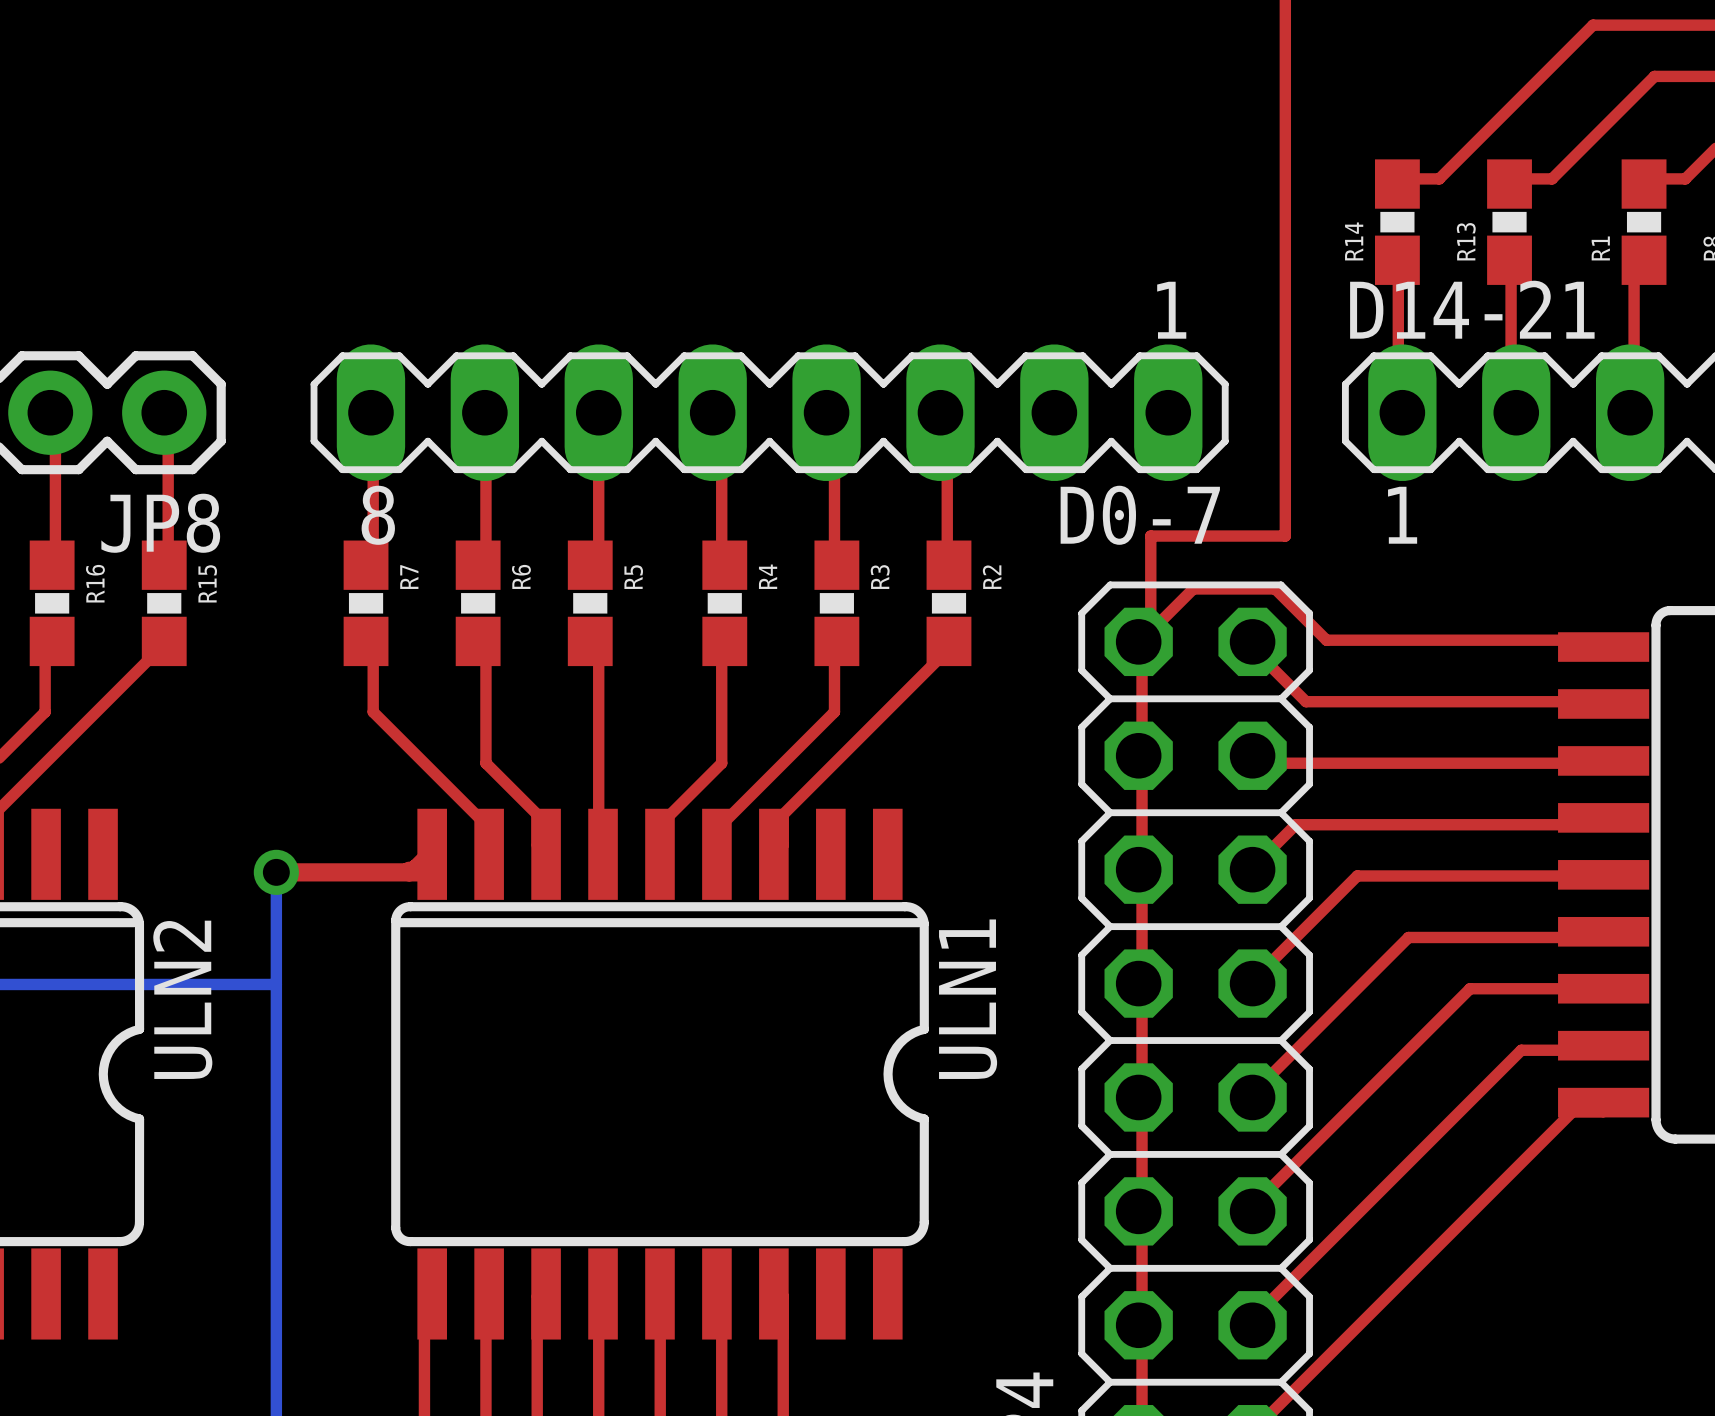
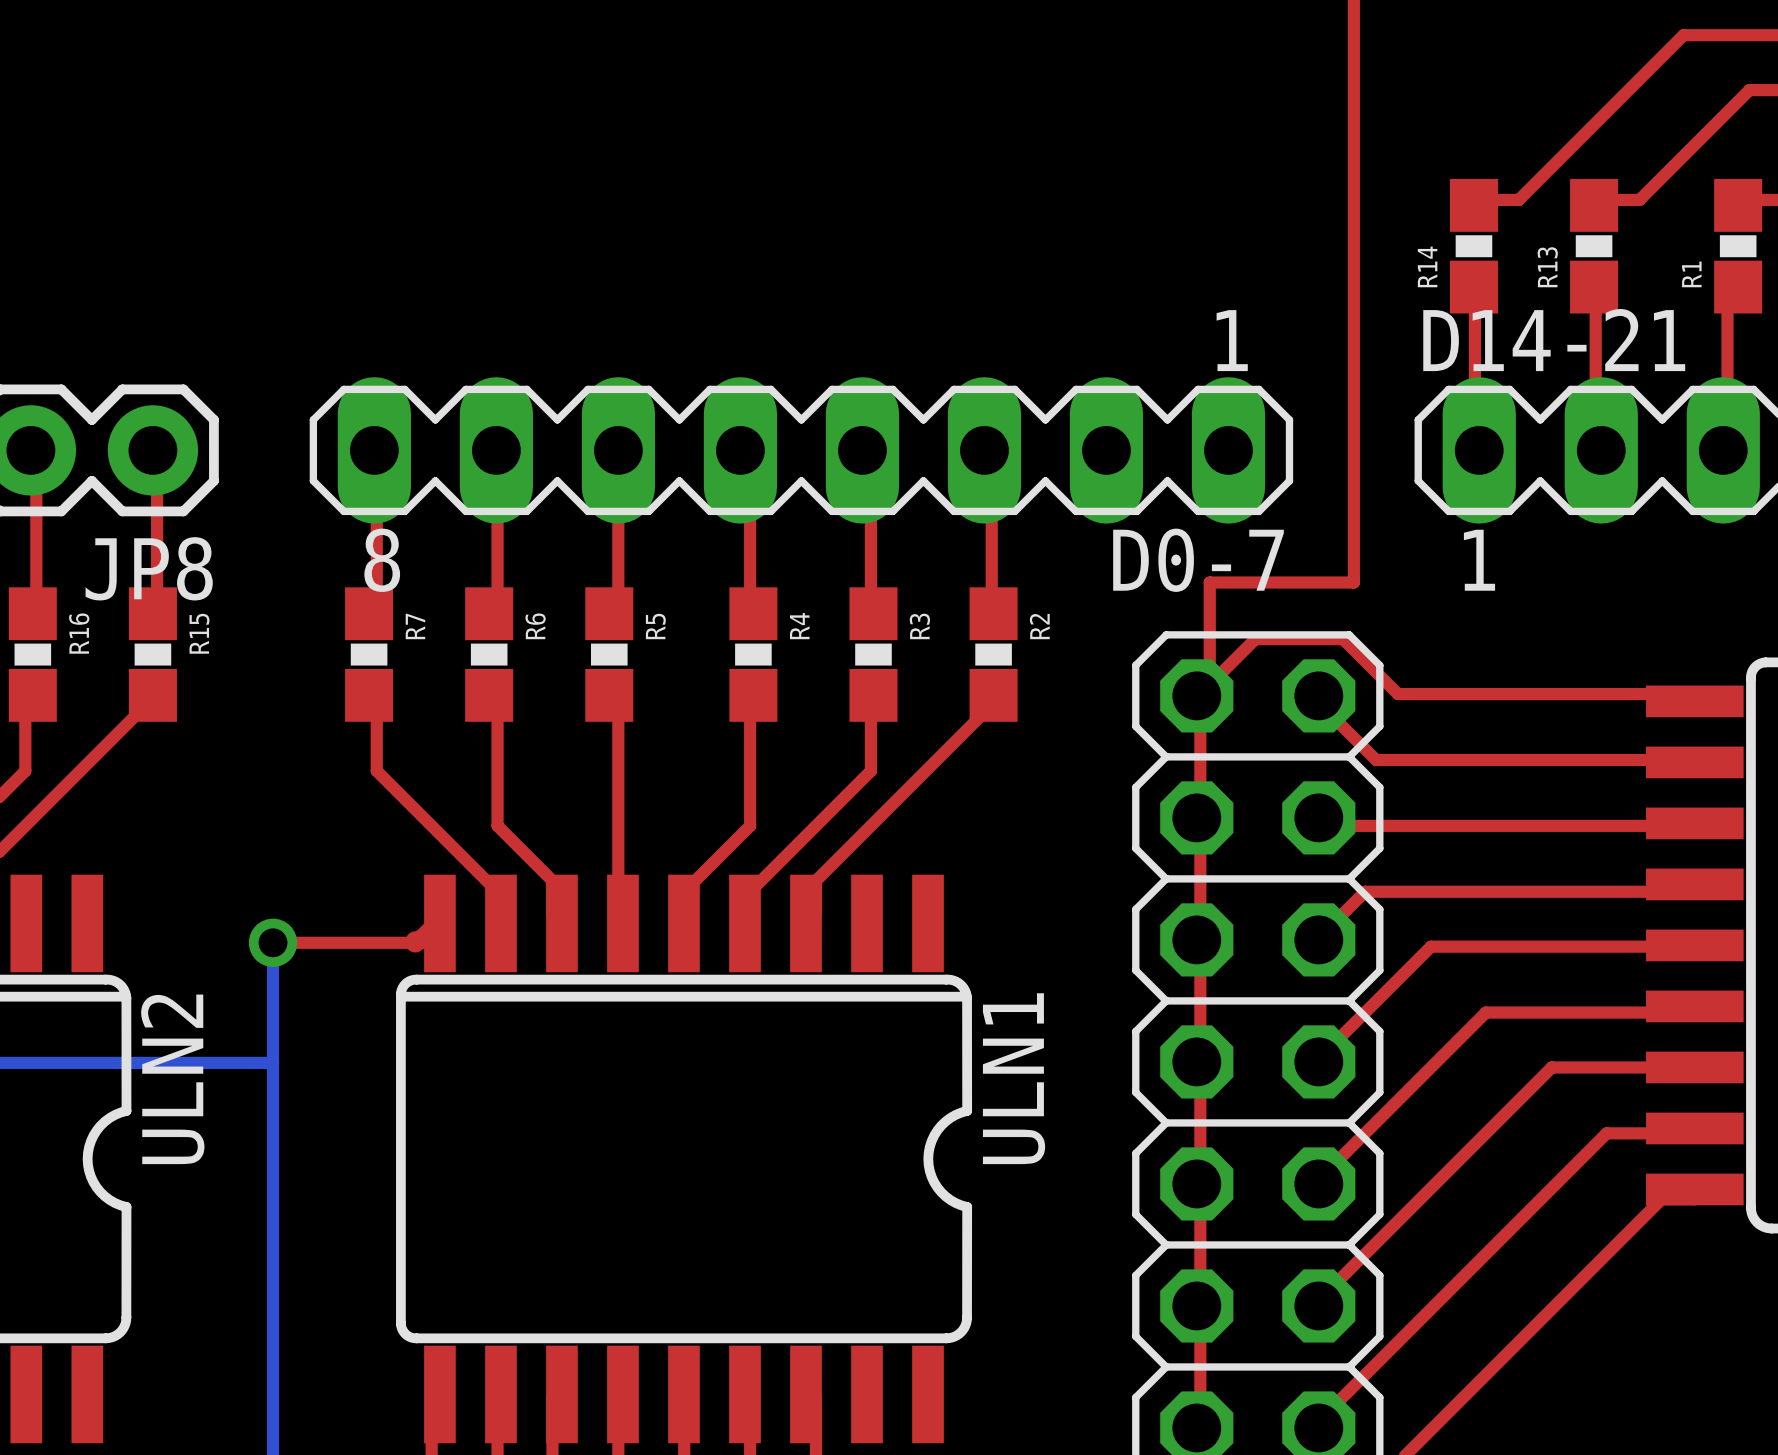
top track width: thick (276, 872) (427, 872) -> thin (273, 942) (434, 942)

